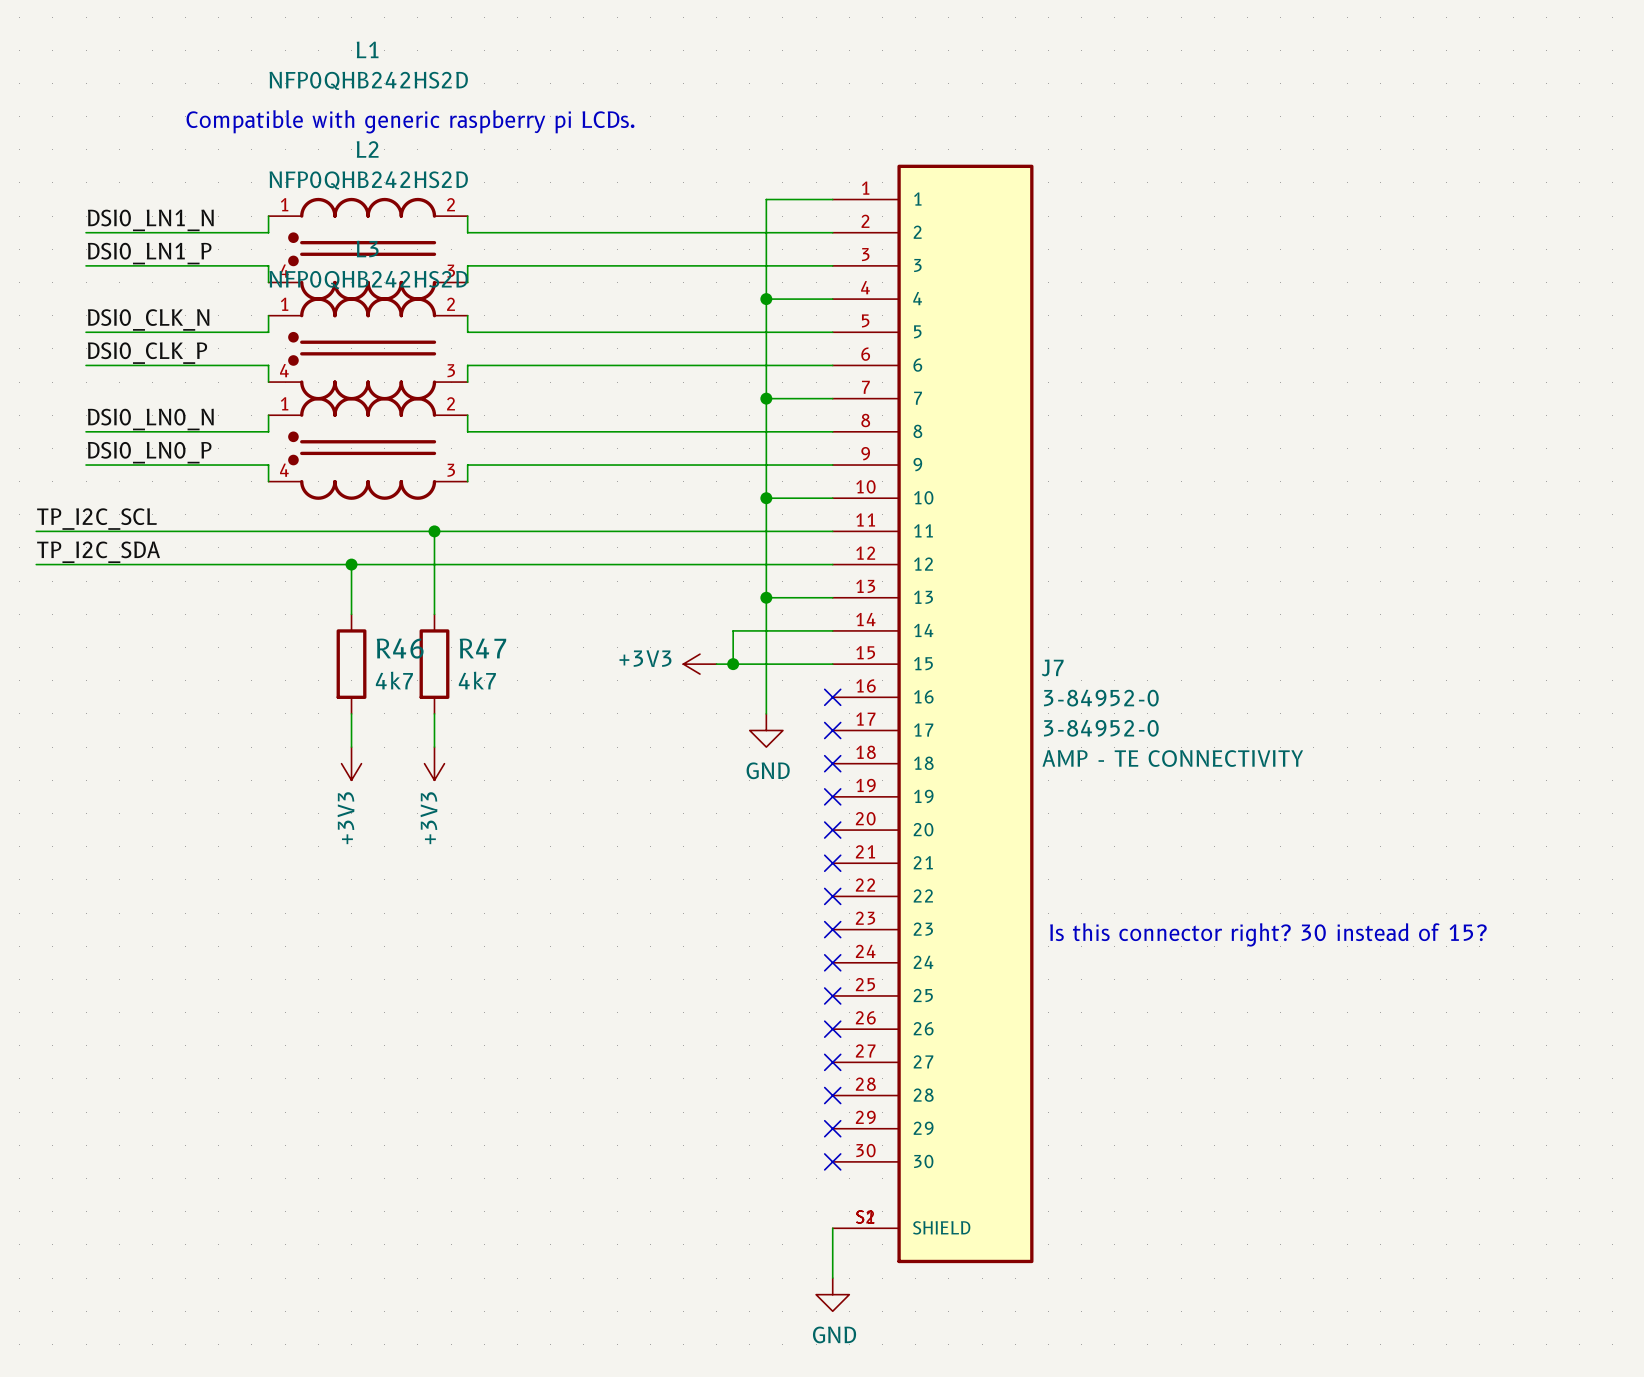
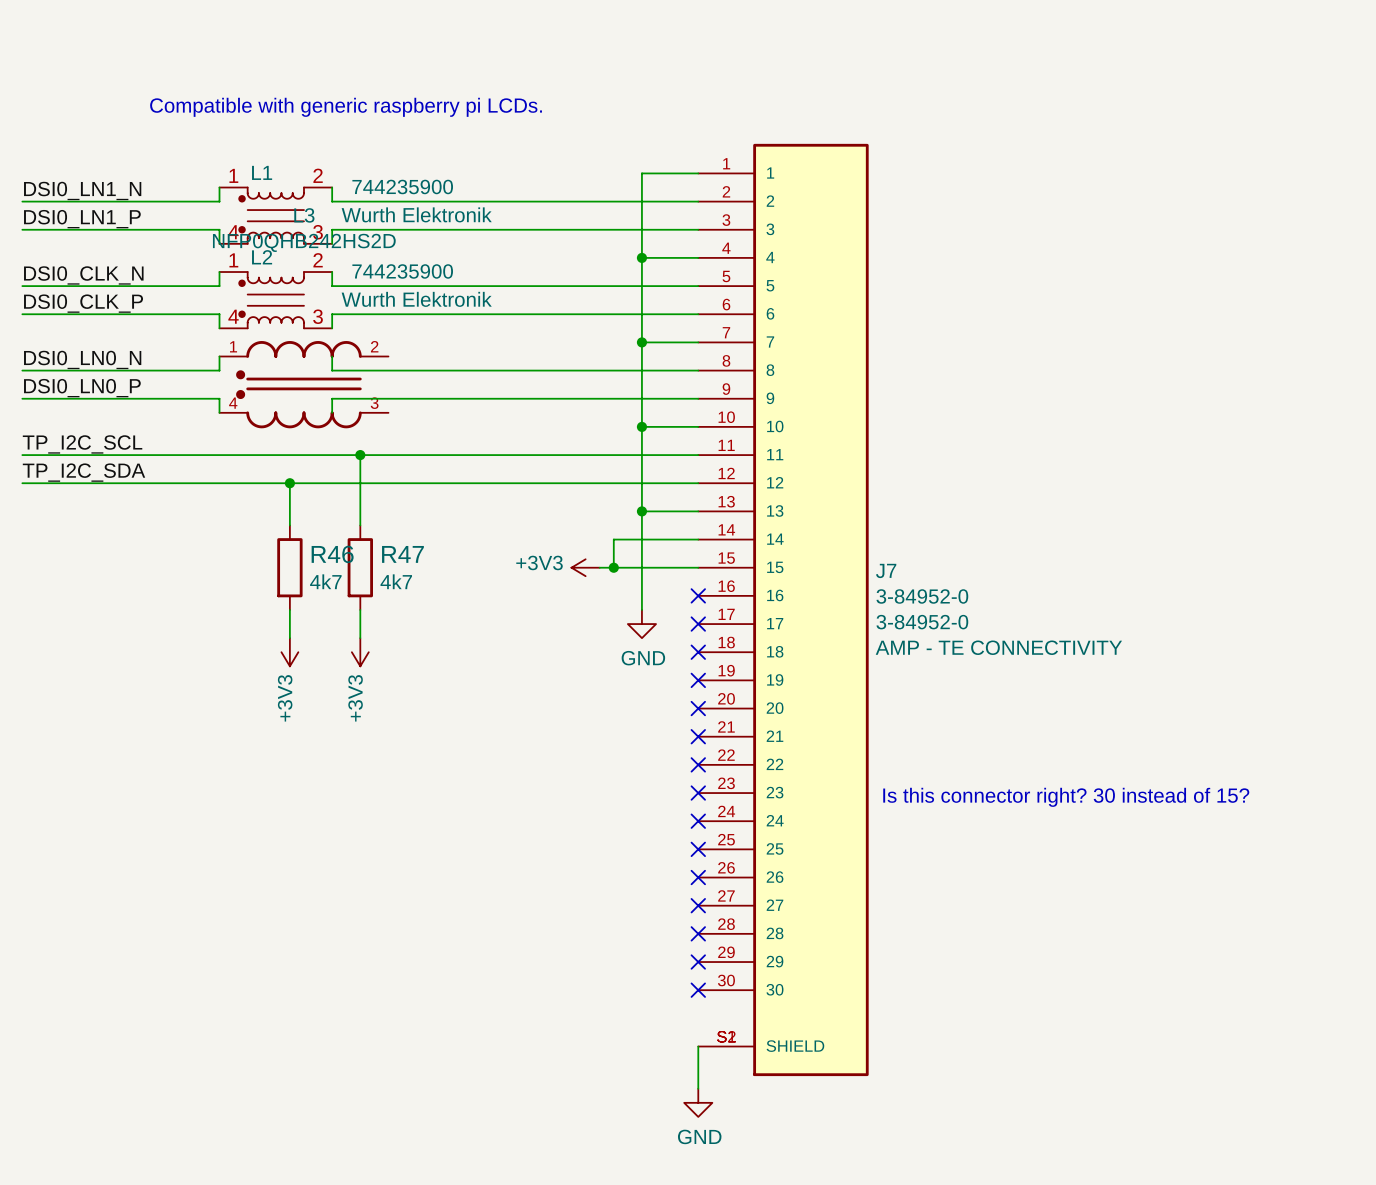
L1 name position: L1 (367, 49) -> L1 (262, 172)
L1 value: NFP0QHB242HS2D (368, 80) -> none
L2 name position: L2 (367, 149) -> L2 (262, 257)
L2 value: NFP0QHB242HS2D (368, 180) -> none
L1 symbol: [268, 197, 468, 301] -> [219, 187, 333, 244]
L1 text: none -> 744235900 (402, 186)
wire: (467, 216) (467, 232) -> (332, 187) (332, 201) (388, 201)
label position: DSI0_LN1_N (150, 220) -> DSI0_LN1_N (82, 190)
wire: none -> (22, 201) (64, 201)
L1 text: none -> Wurth Elektronik (416, 214)
label position: DSI0_LN1_P (149, 253) -> DSI0_LN1_P (82, 219)
wire: none -> (22, 229) (64, 229)
wire: (467, 265) (467, 282) -> (388, 229) (332, 229) (332, 243)
L2 symbol: [268, 297, 468, 401] -> [219, 272, 333, 329]
wire: (467, 315) (467, 332) -> (332, 272) (332, 286) (388, 286)
L2 text: none -> 744235900 (402, 271)
label position: DSI0_CLK_N (148, 319) -> DSI0_CLK_N (83, 275)
wire: none -> (22, 286) (64, 286)
L2 text: none -> Wurth Elektronik (416, 299)
label position: DSI0_CLK_P (147, 353) -> DSI0_CLK_P (83, 303)
wire: none -> (22, 314) (64, 314)
wire: (467, 365) (467, 382) -> (388, 314) (332, 314) (332, 328)
wire: (467, 415) (467, 431) -> (332, 356) (332, 370) (388, 370)
label position: DSI0_LN0_N (150, 419) -> DSI0_LN0_N (82, 359)
wire: none -> (22, 370) (64, 370)
label position: DSI0_LN0_P (149, 452) -> DSI0_LN0_P (82, 388)
wire: none -> (22, 398) (64, 398)
wire: (467, 465) (467, 481) -> (388, 398) (332, 398) (332, 412)

